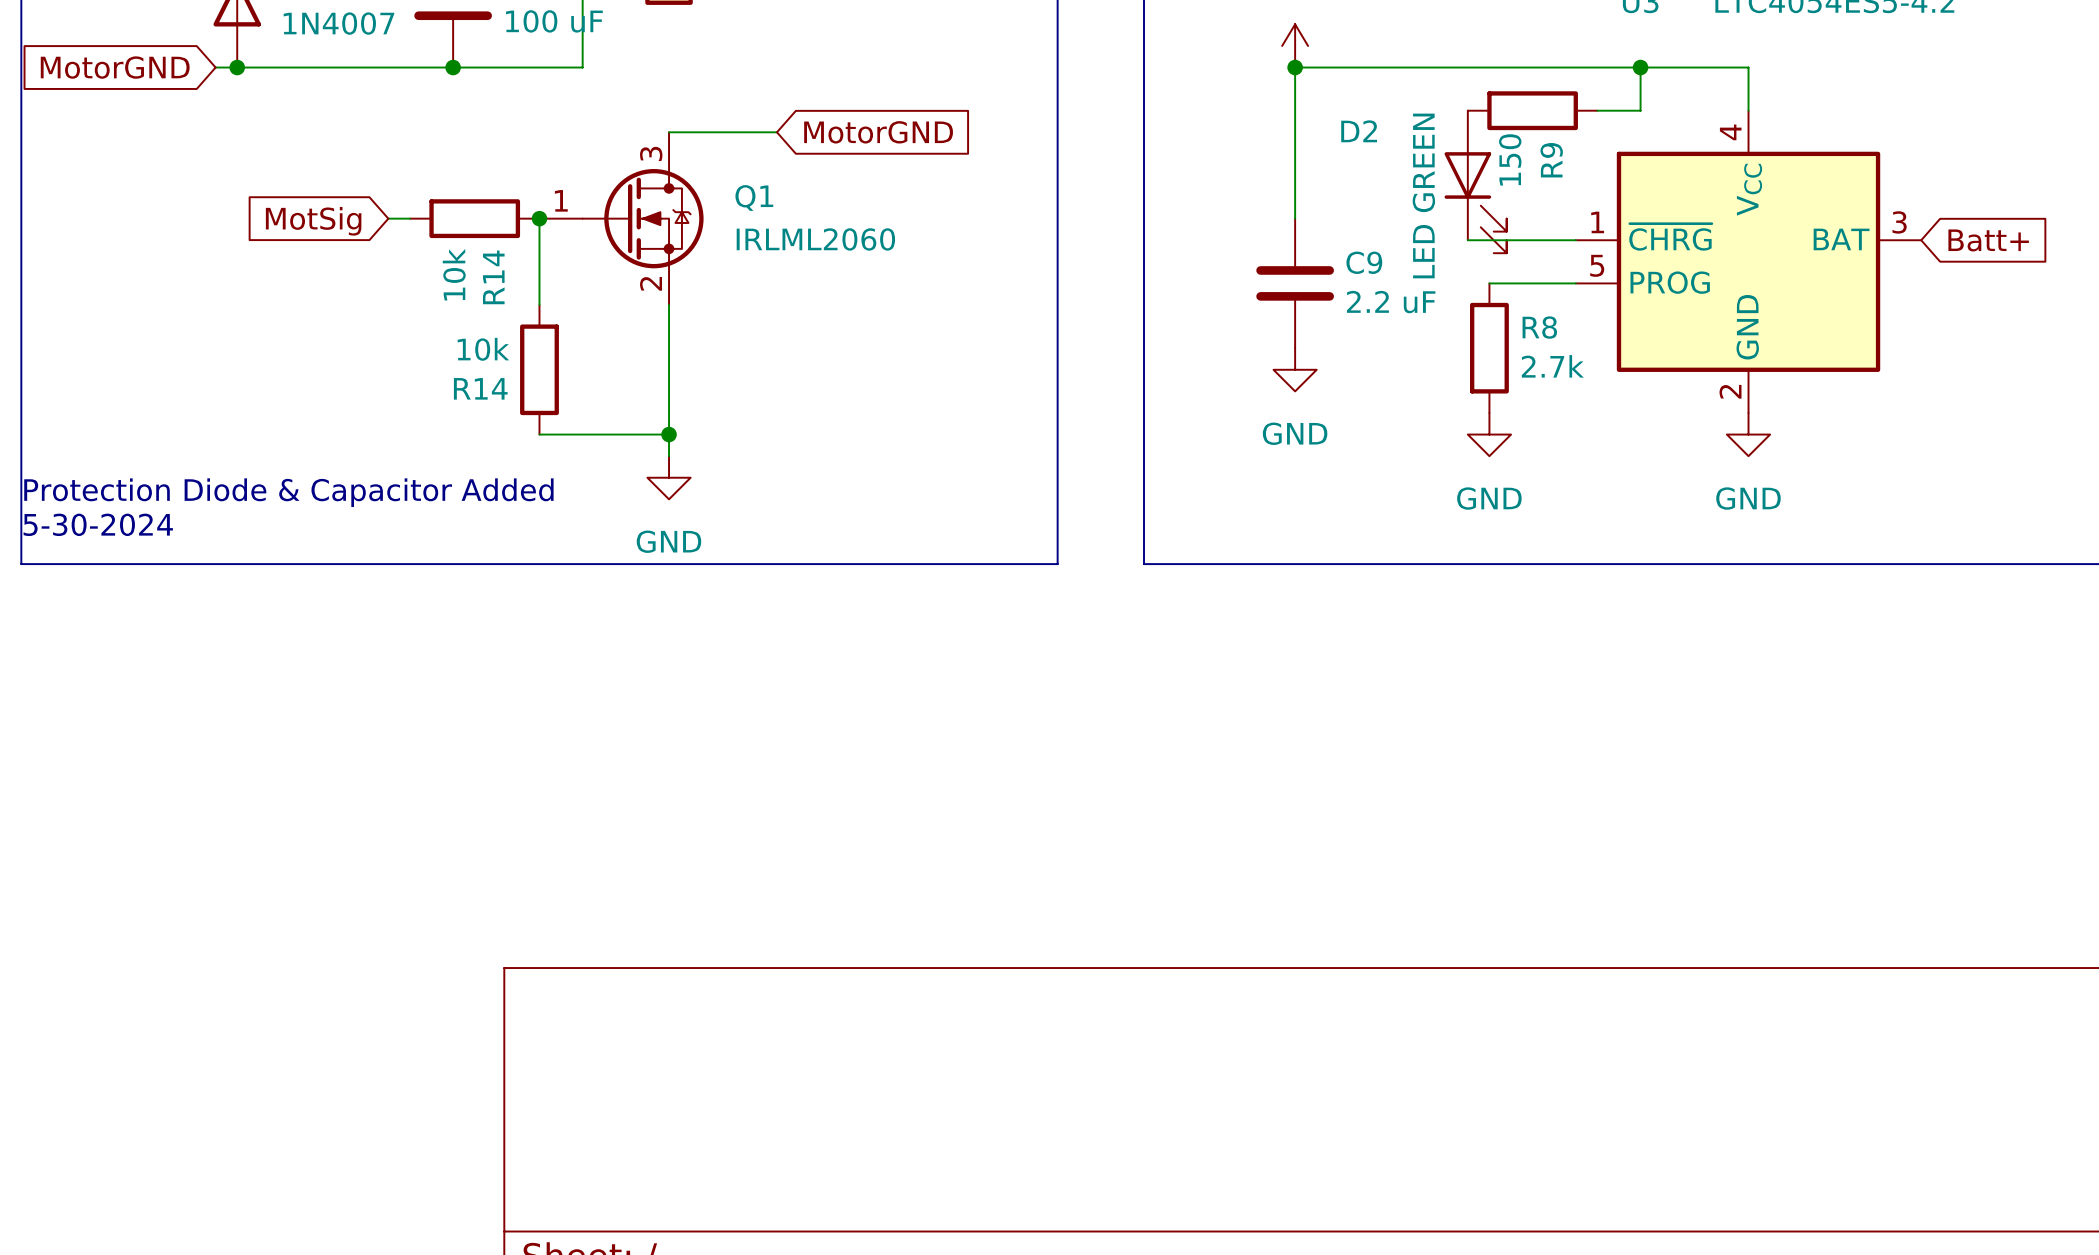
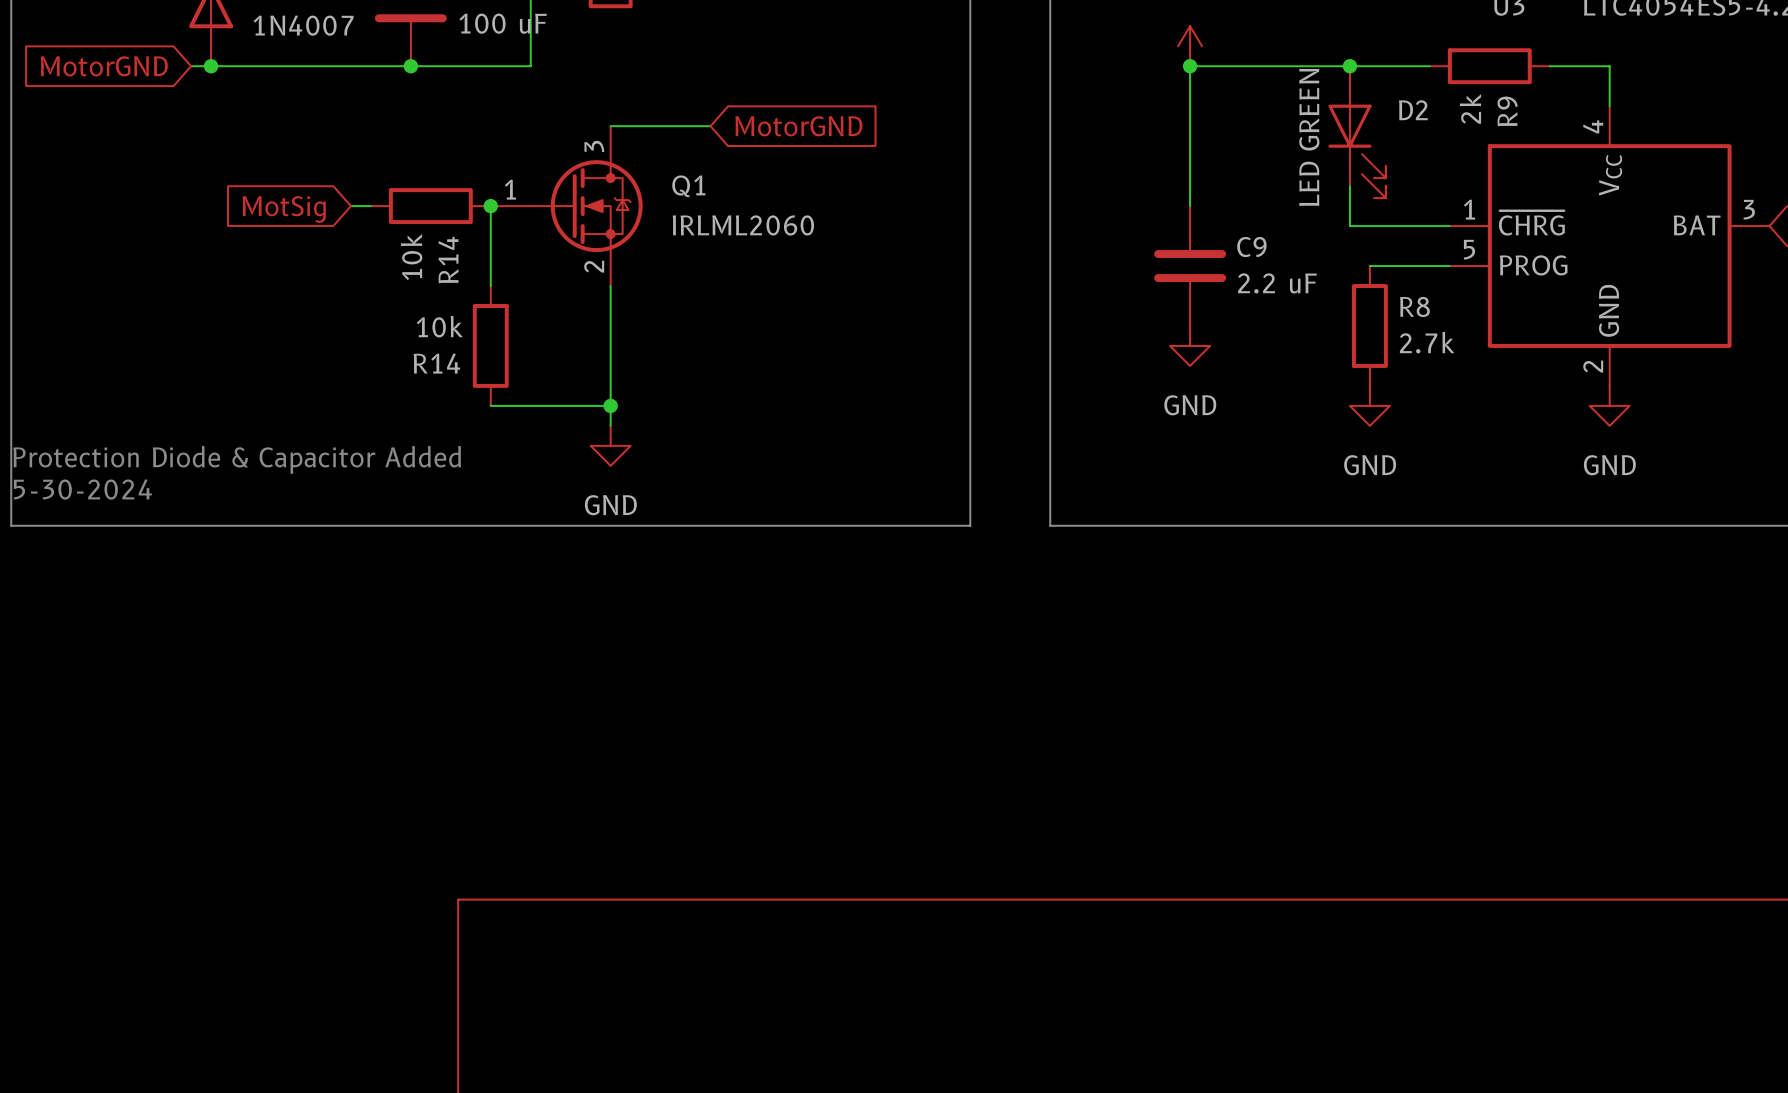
junction: none -> (1349, 66)
wire: (1554, 67) (1683, 67) -> none
wire: (1640, 67) (1640, 110) (1597, 110) -> none
junction: (1640, 67) -> none
R9 position: (1532, 110) -> (1489, 66)
D2 name position: D2 (1359, 131) -> D2 (1413, 110)
R9 value: 150 (1510, 159) -> 2k (1470, 108)
D2 position: (1475, 181) -> (1357, 132)

